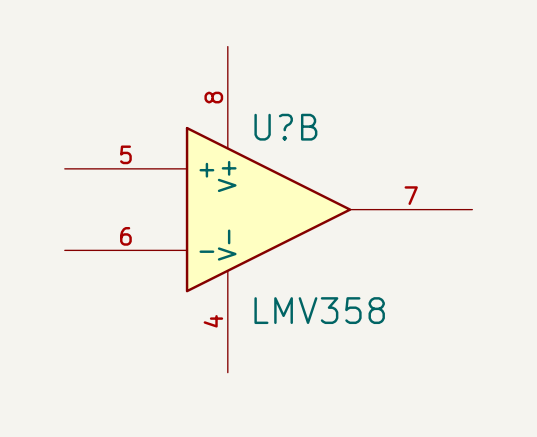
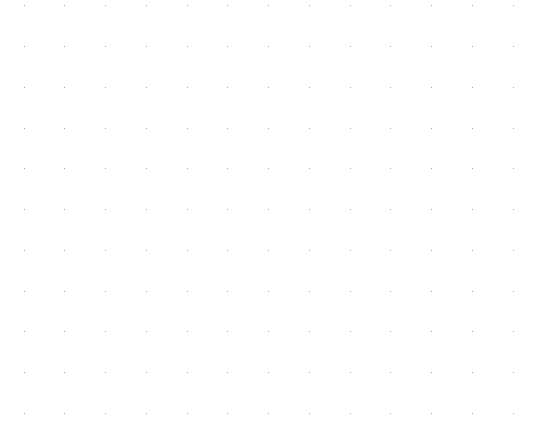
U?B: LMV358 (268, 209) -> none

